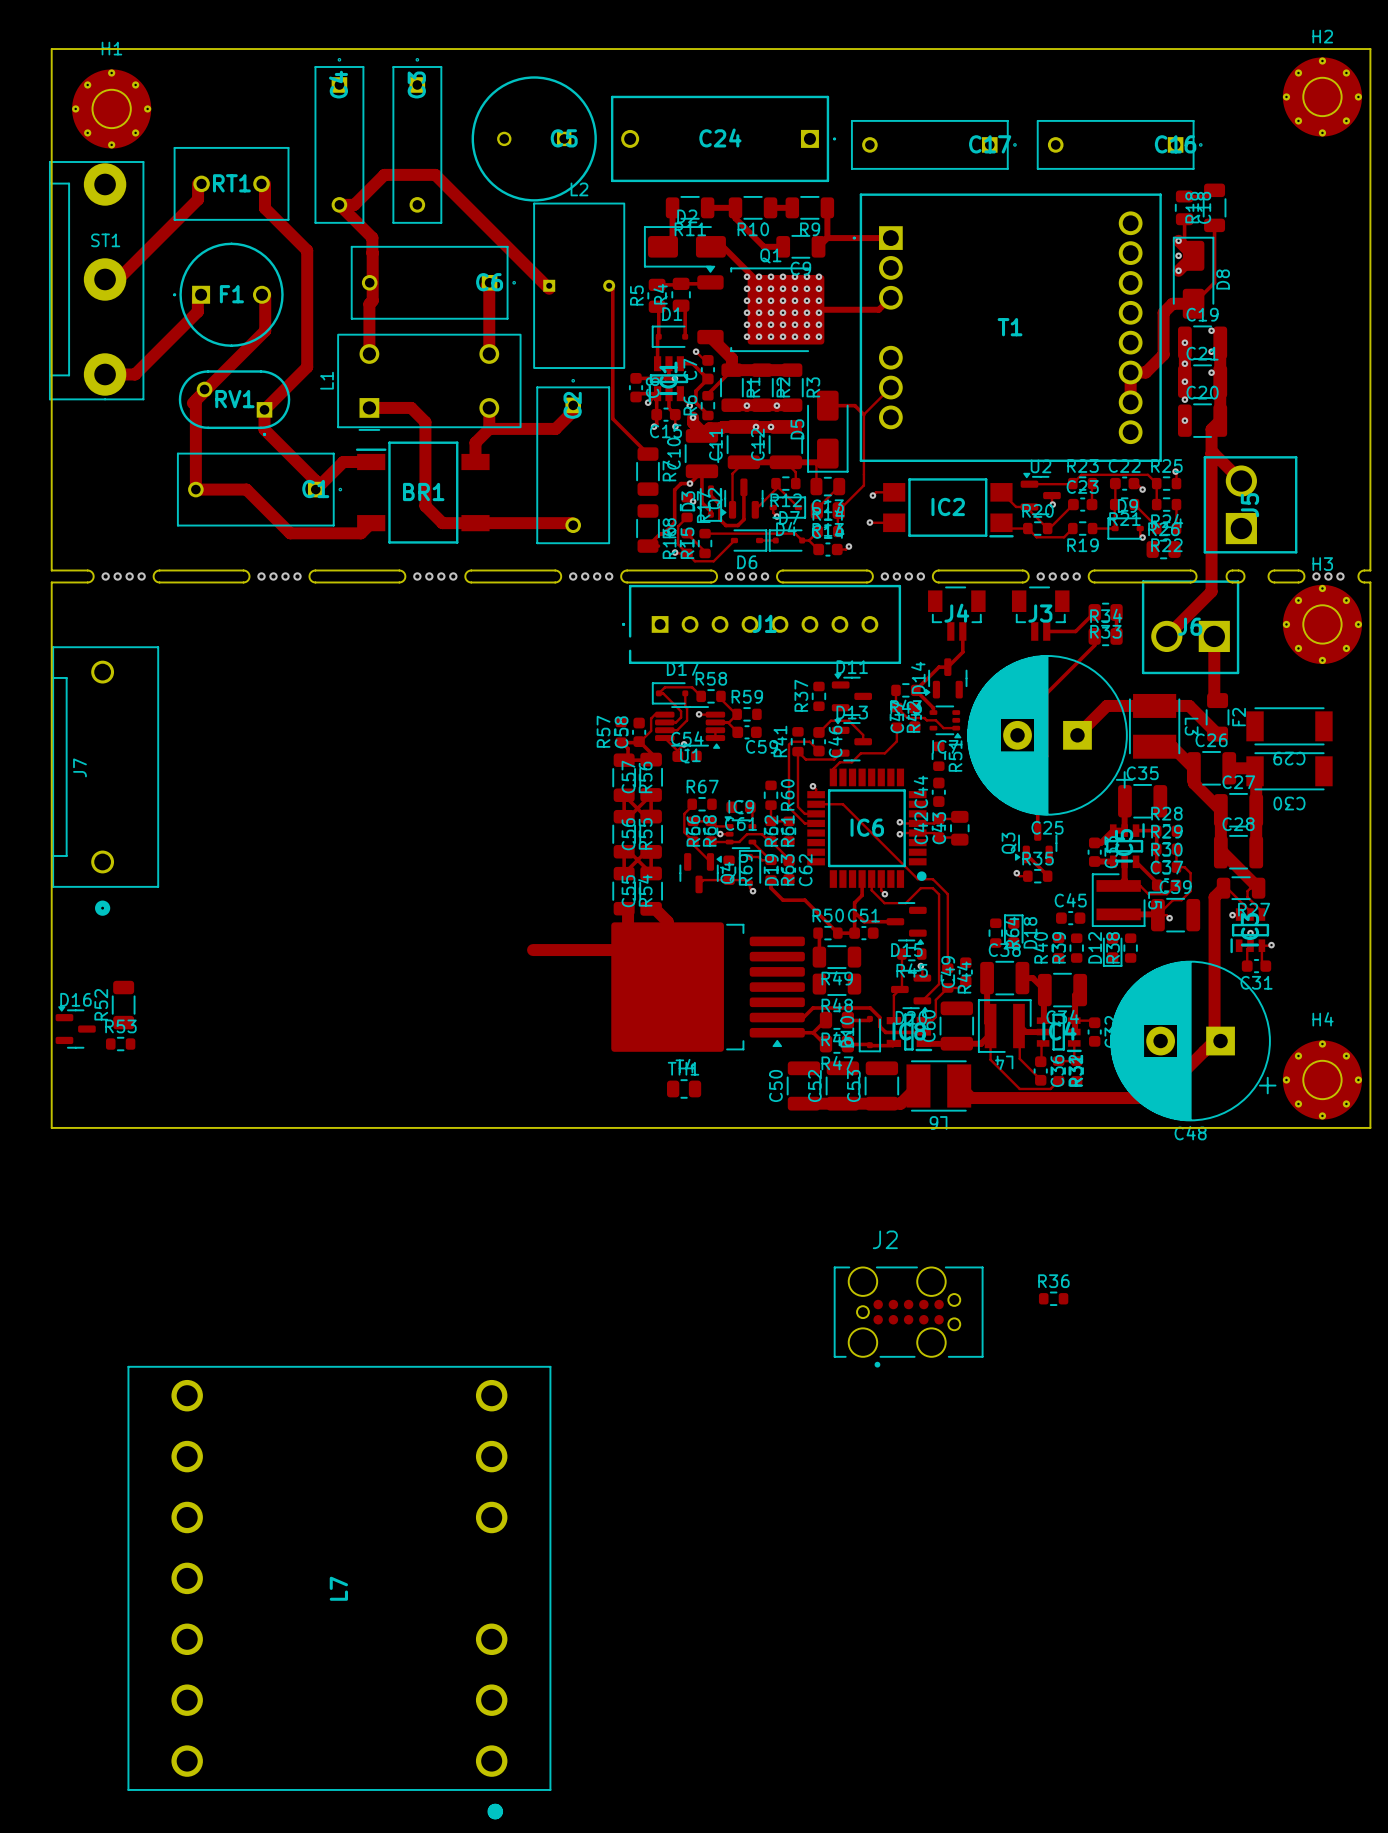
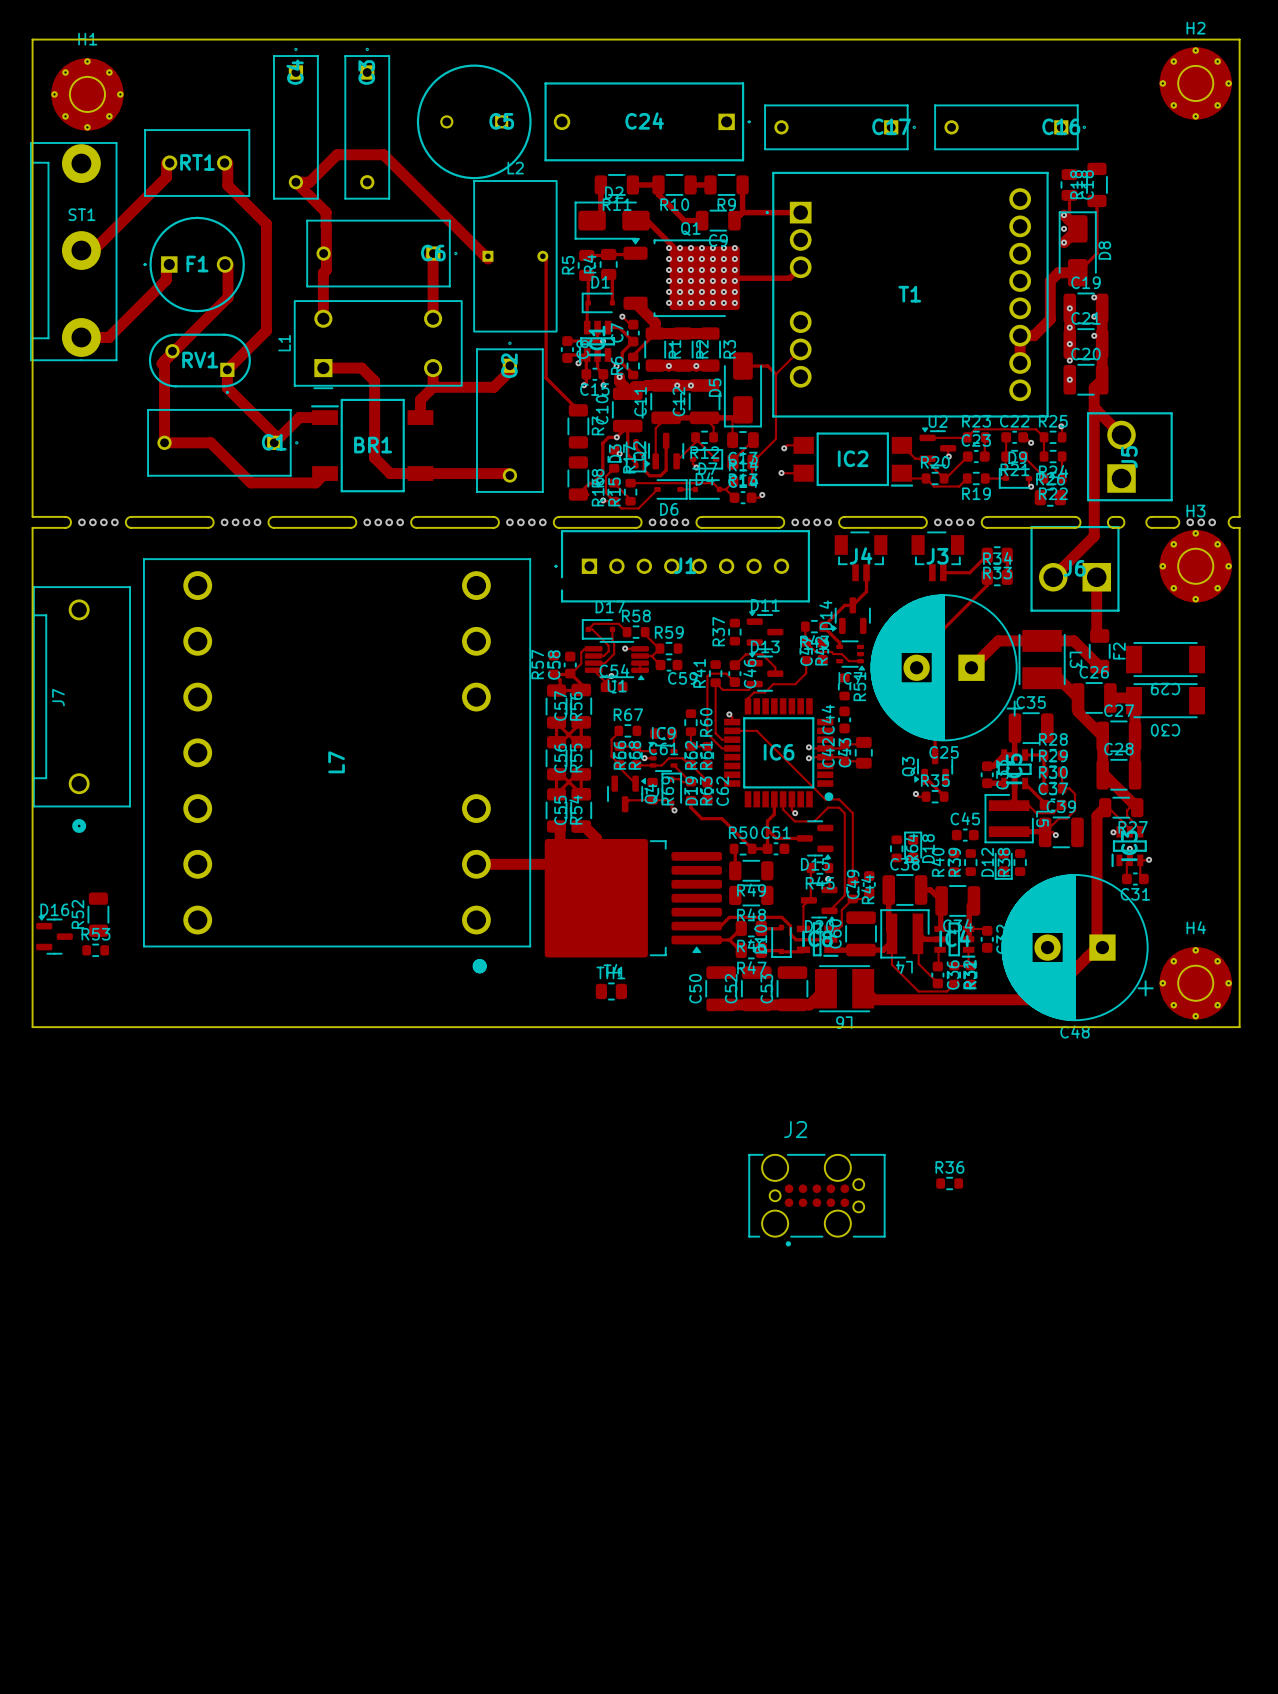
L7 position: (339, 1592) -> (337, 765)

